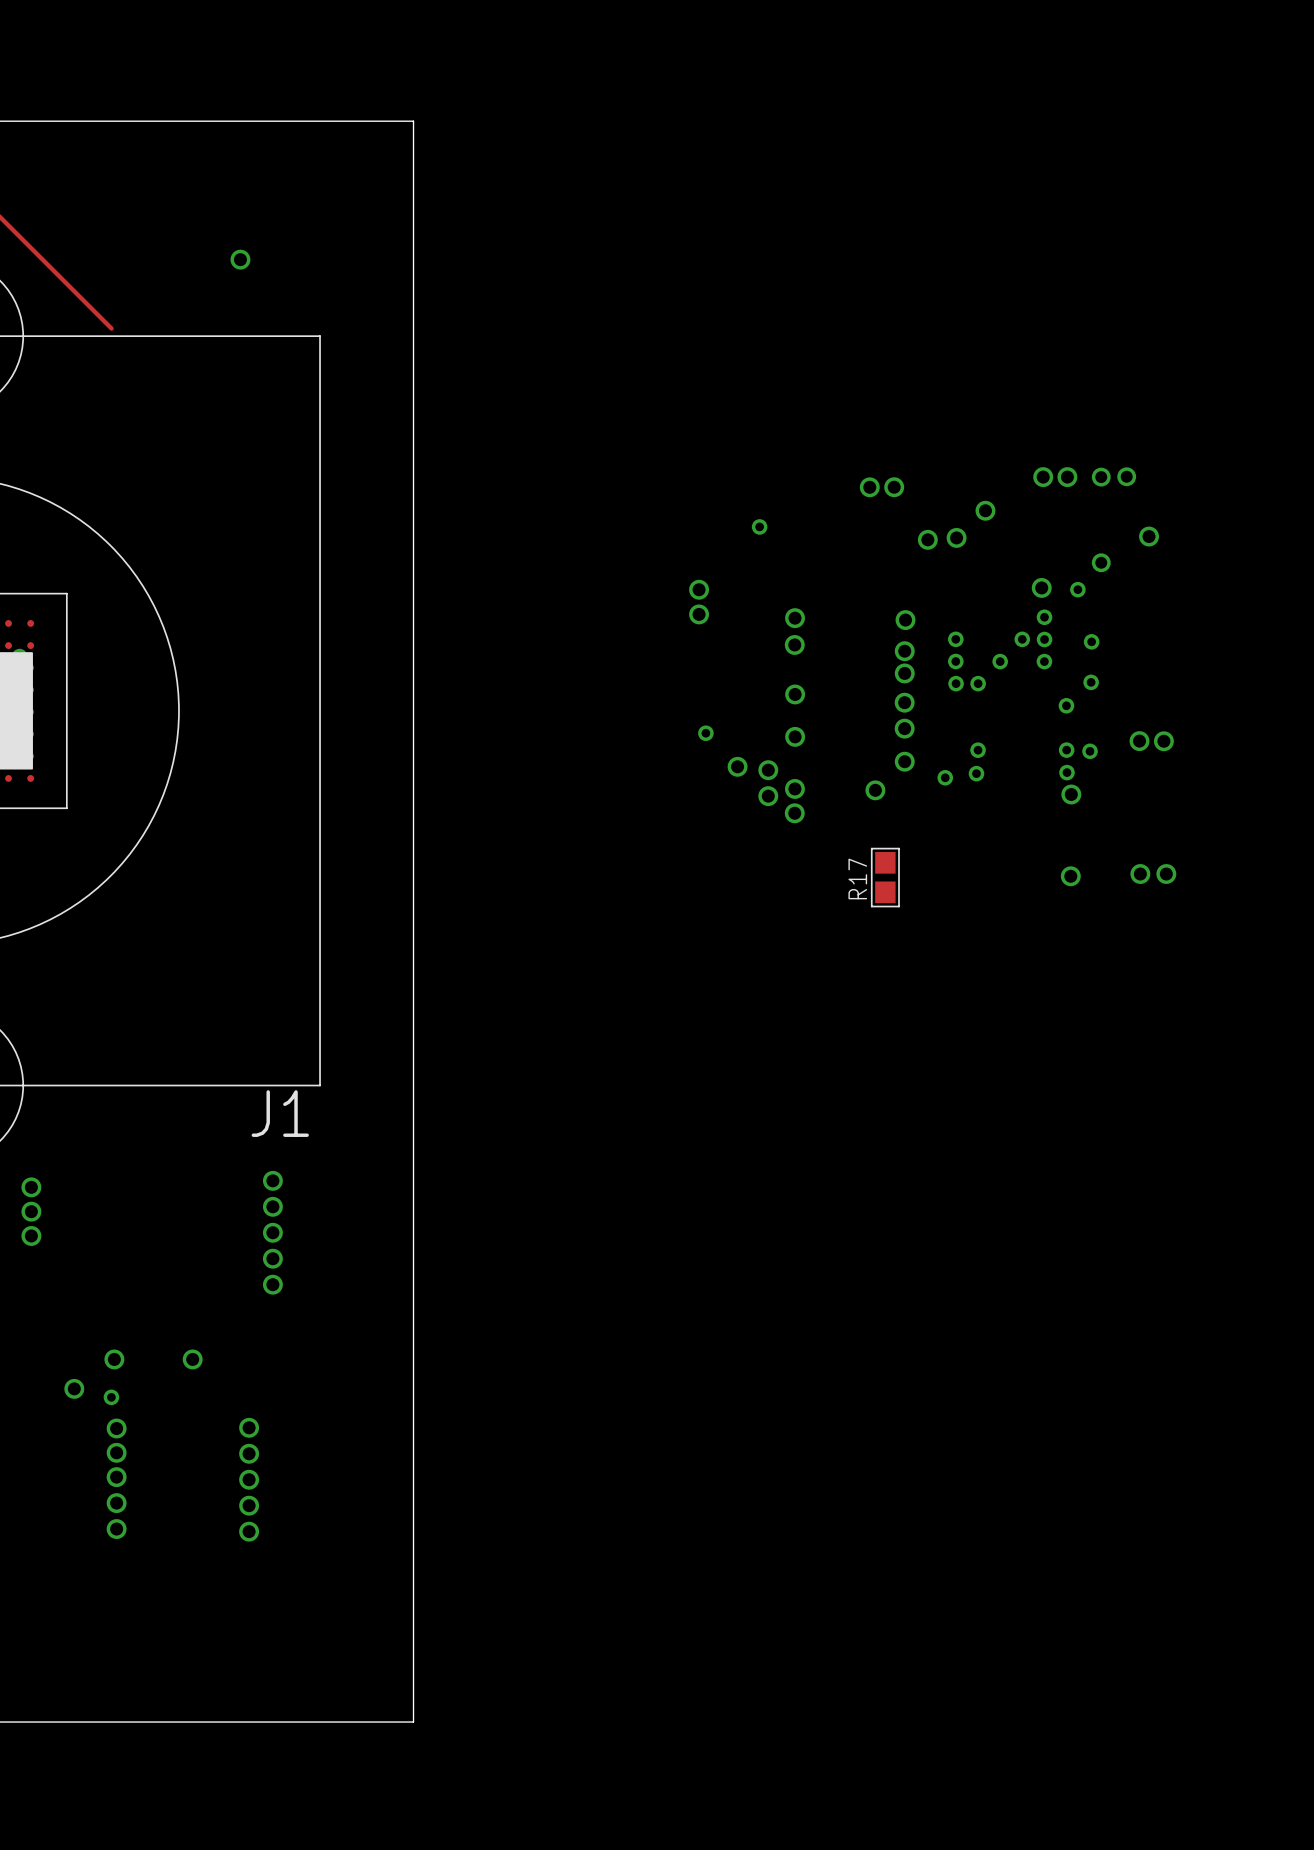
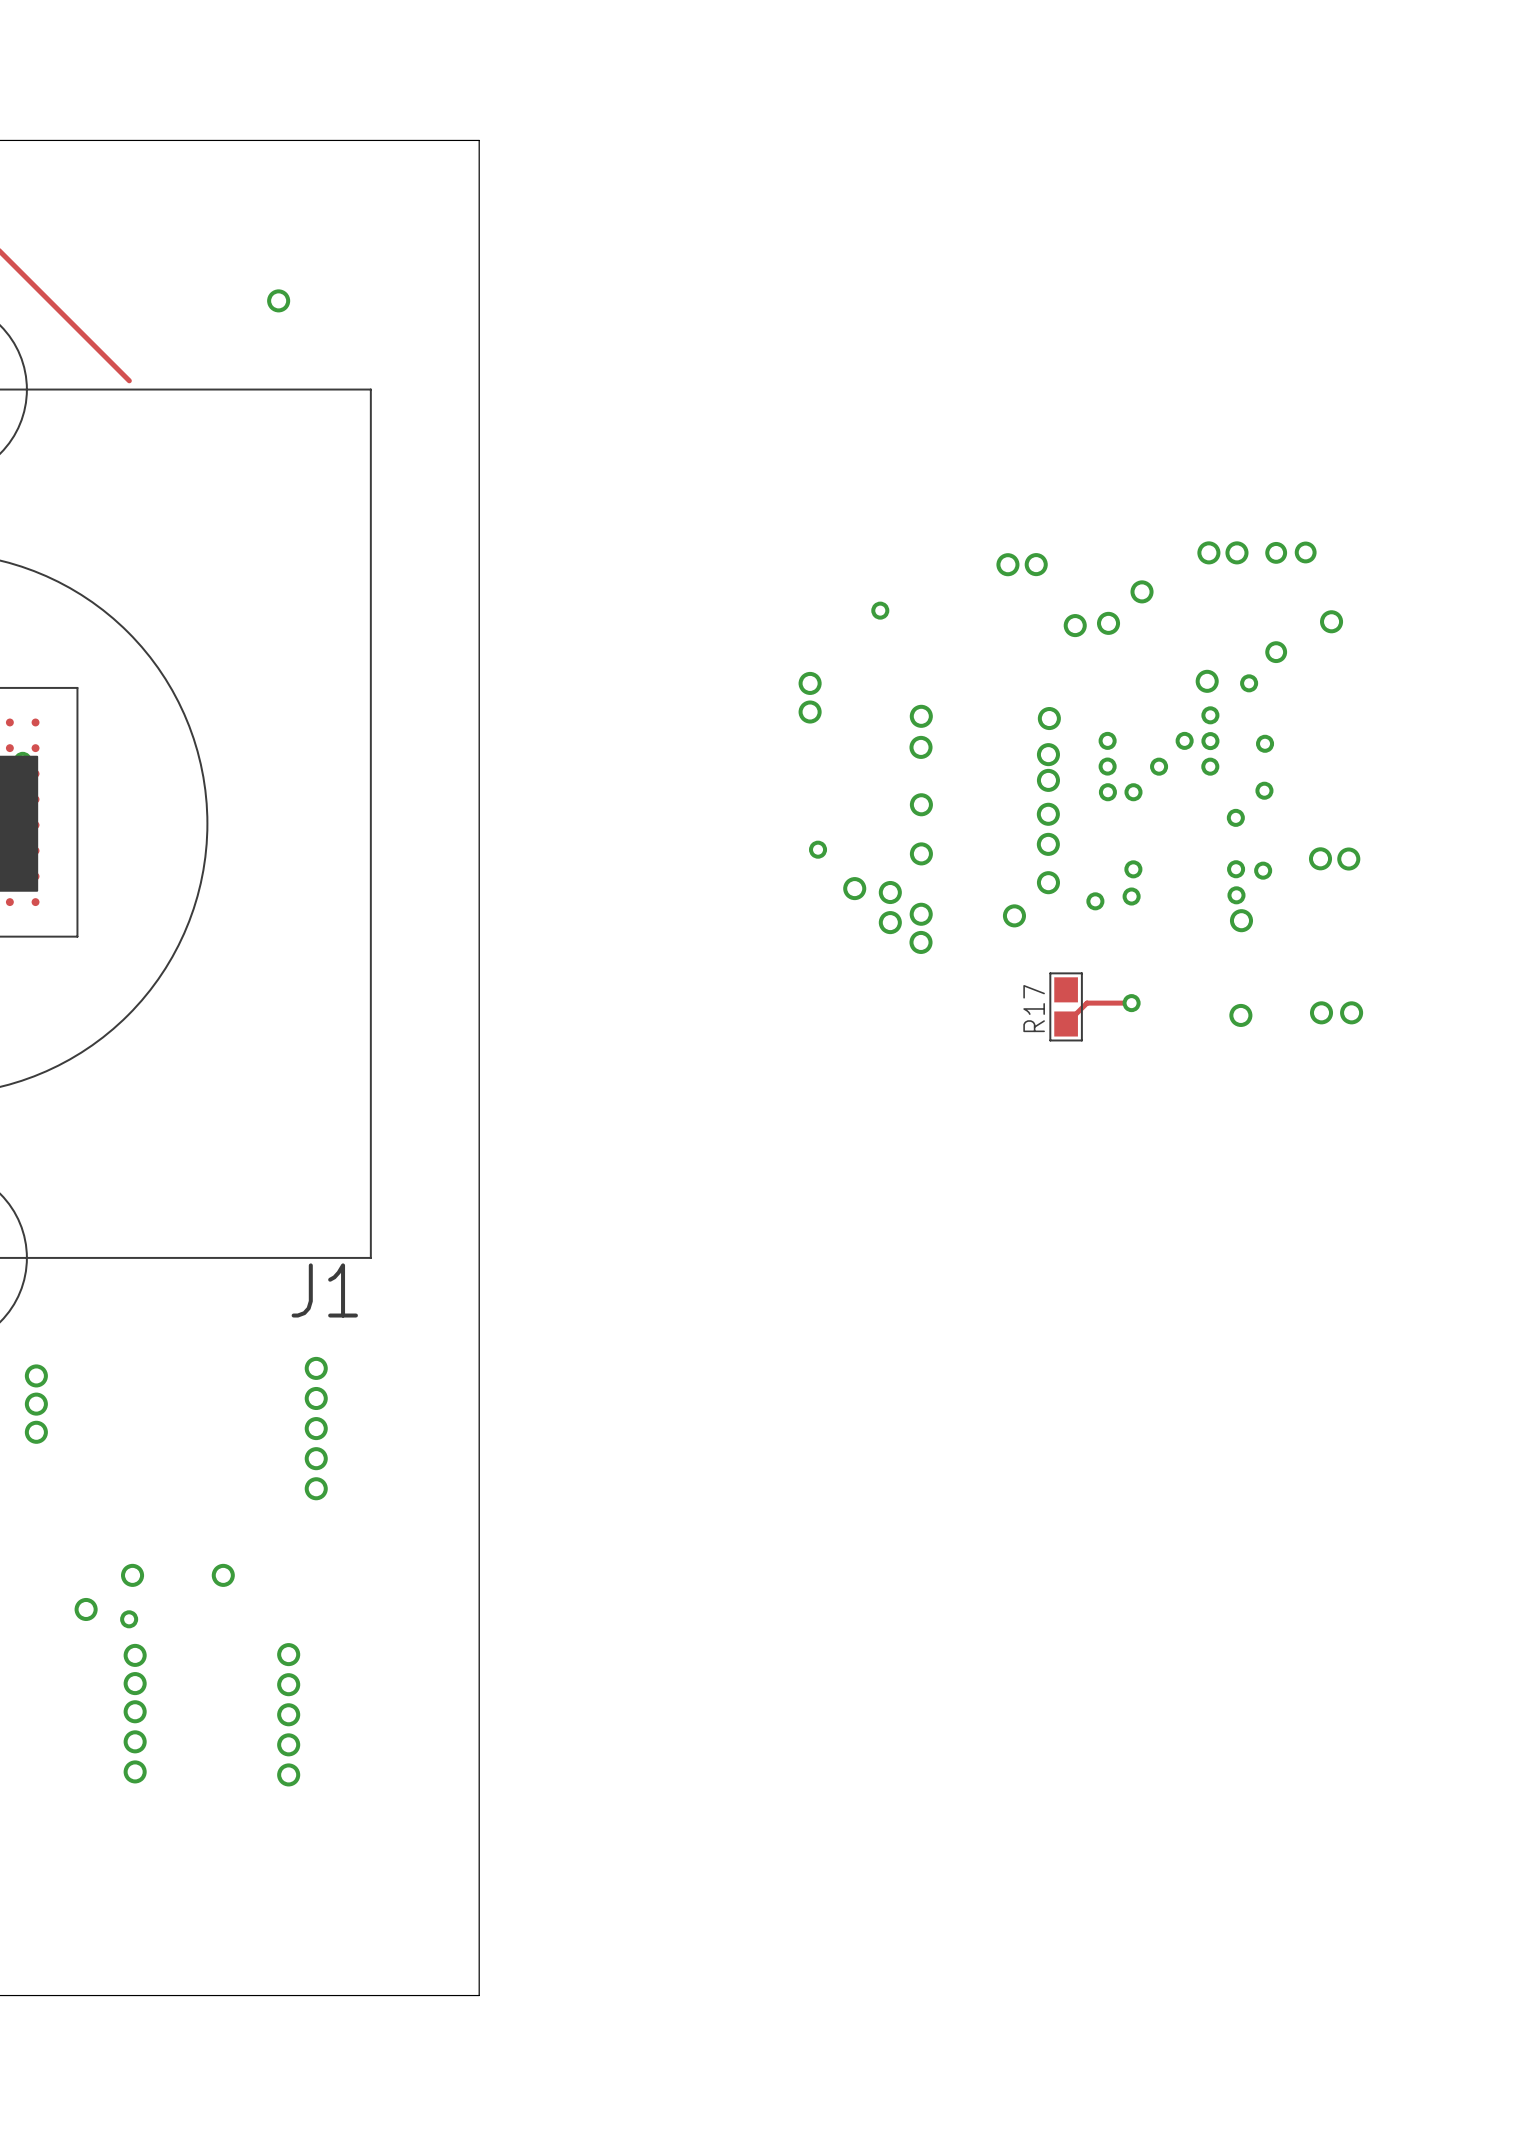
track: none -> (1131, 1003) (1086, 1003) (1066, 1023)
via: none -> (1131, 1003)
R17 position: (885, 877) -> (1066, 1006)

